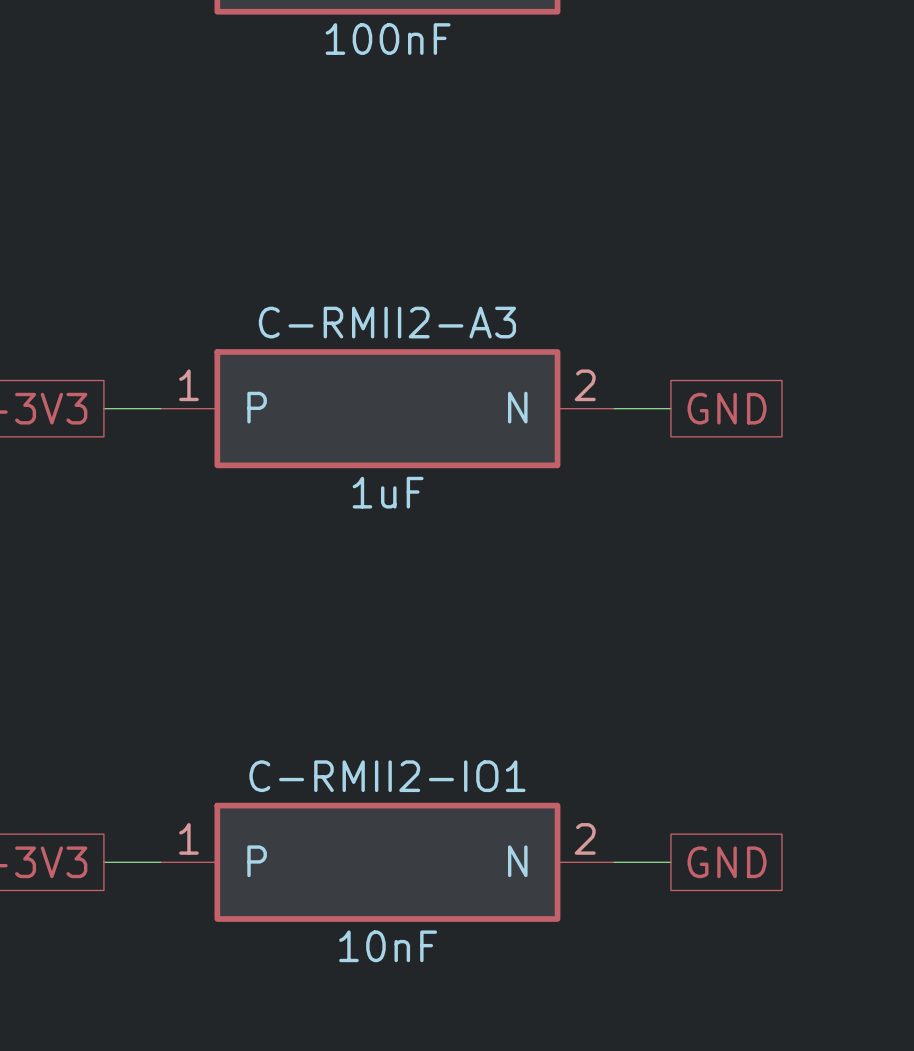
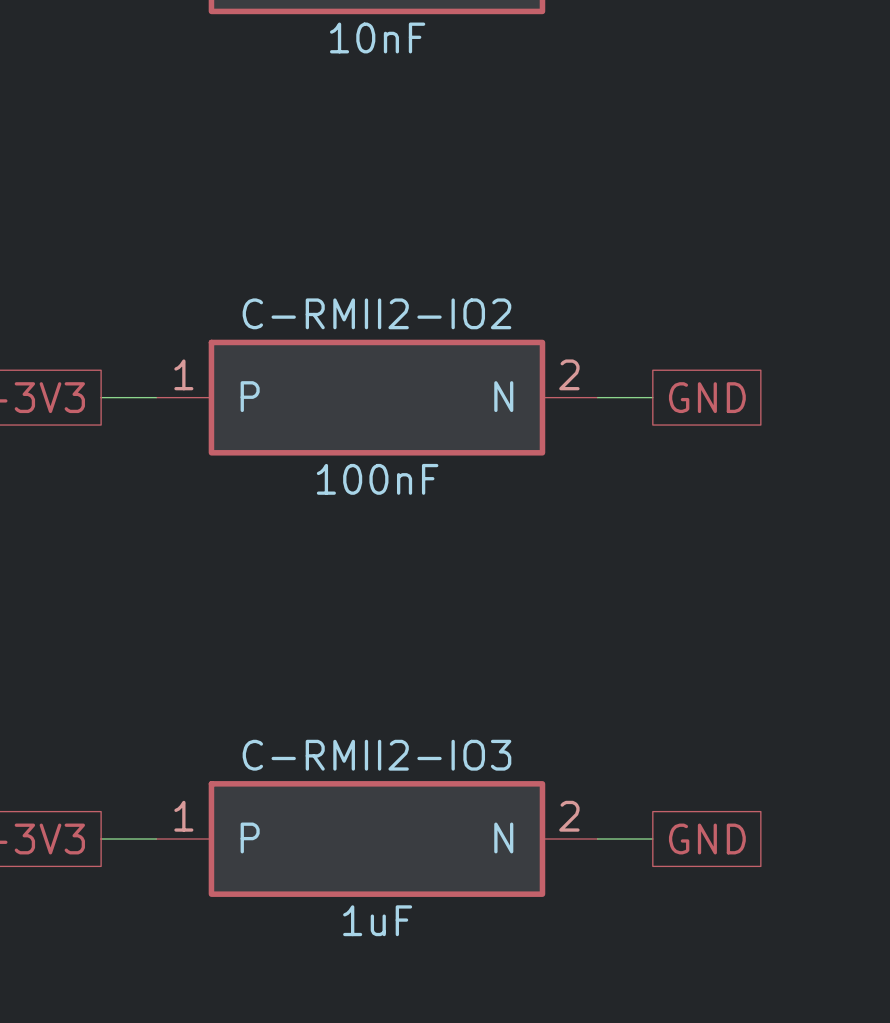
part value: 100nF (388, 39) -> 10nF (377, 37)
C-RMII2-A3 name: C-RMII2-A3 (387, 322) -> C-RMII2-IO2 (376, 313)
C-RMII2-A3 value: 1uF (388, 492) -> 100nF (377, 479)
C-RMII2-IO1 name: C-RMII2-IO1 (387, 776) -> C-RMII2-IO3 (376, 755)
C-RMII2-IO1 value: 10nF (388, 946) -> 1uF (377, 920)

